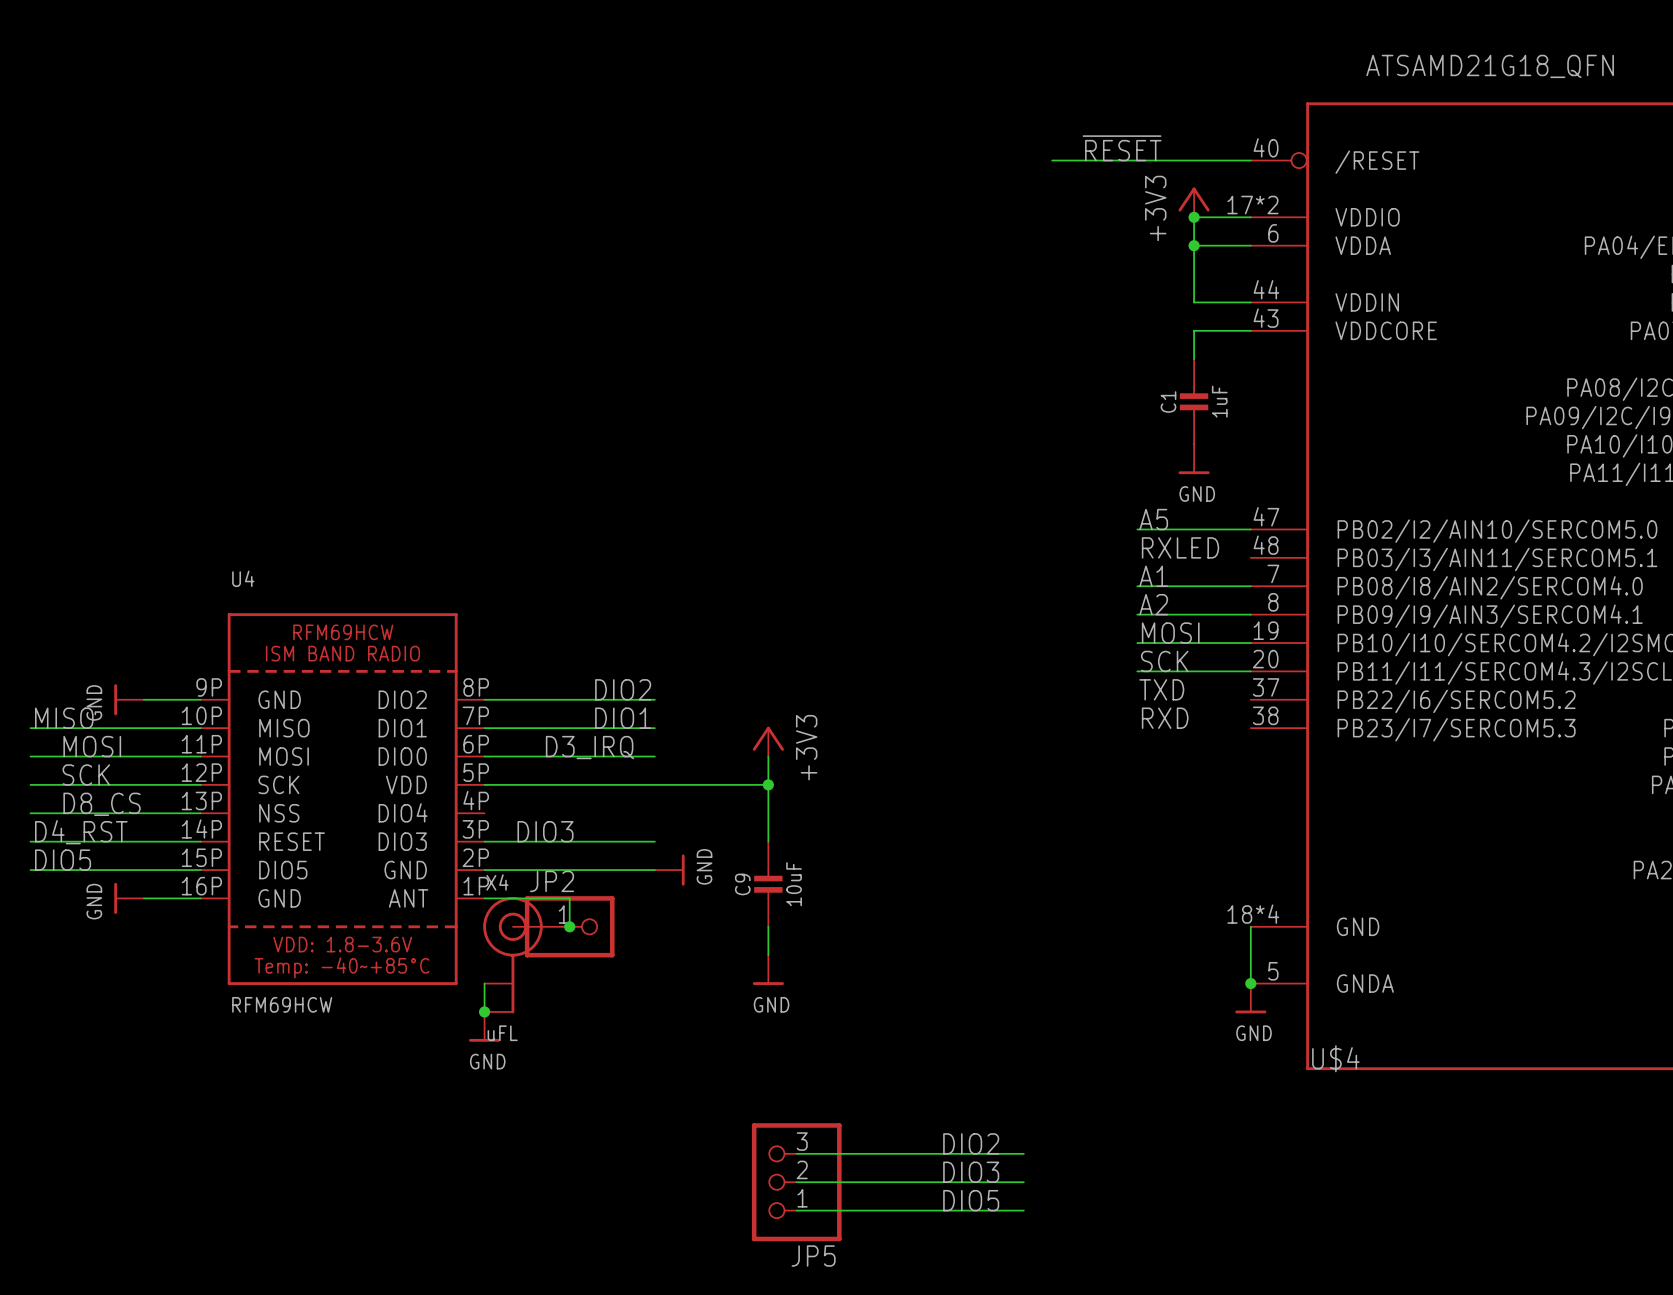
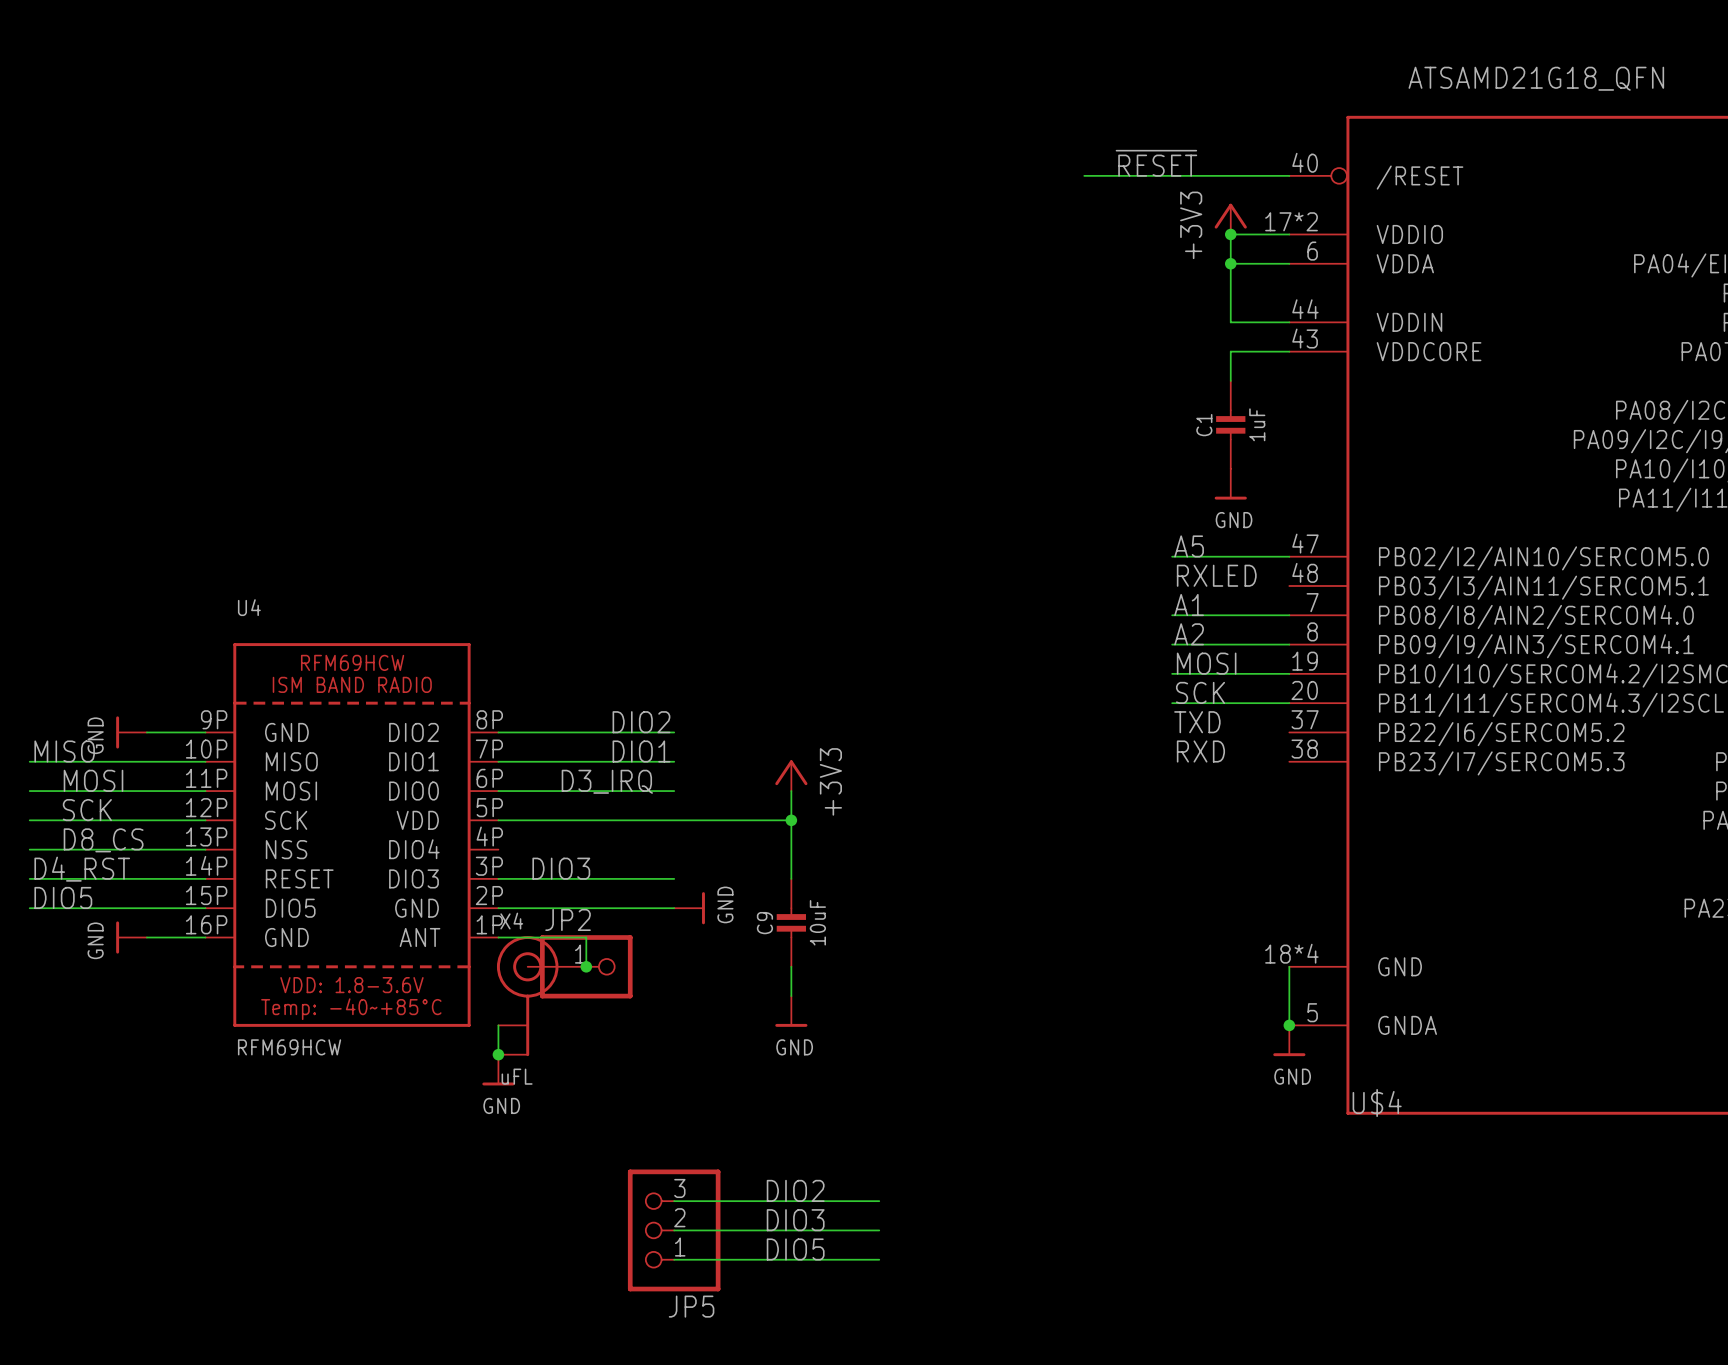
label position: DIO2 (971, 1143) -> DIO2 (795, 1190)
wire: none -> (674, 1201) (820, 1201)
wire: (853, 1153) (1023, 1153) -> none
label position: DIO3 (971, 1172) -> DIO3 (795, 1220)
wire: none -> (674, 1230) (820, 1230)
JP5 position: (796, 1182) -> (674, 1230)
wire: (853, 1182) (1023, 1182) -> none
label position: DIO5 (971, 1200) -> DIO5 (795, 1249)
wire: none -> (674, 1259) (820, 1259)
wire: (853, 1210) (1023, 1210) -> none

